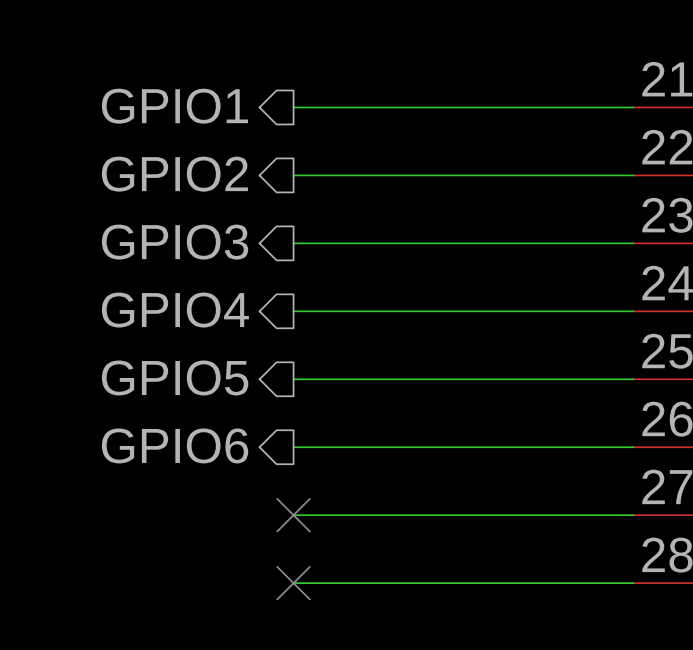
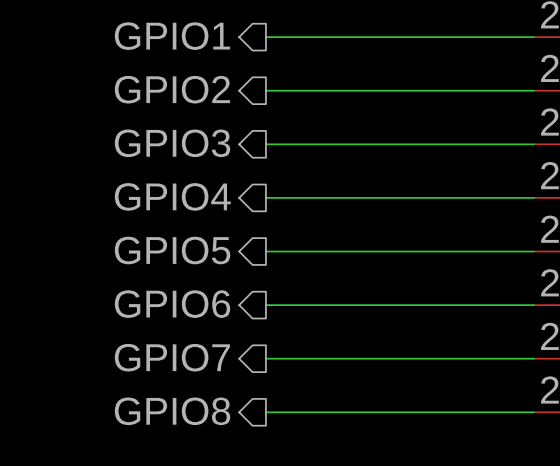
hierarchical label: none -> GPIO7 (172, 357)
no-connect mark: (293, 515) -> none
hierarchical label: none -> GPIO8 (172, 411)
no-connect mark: (293, 583) -> none

